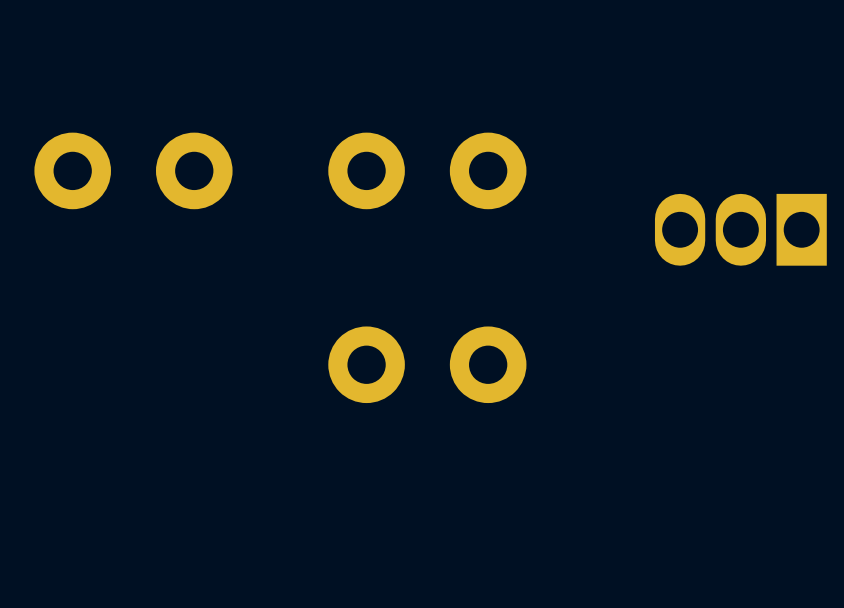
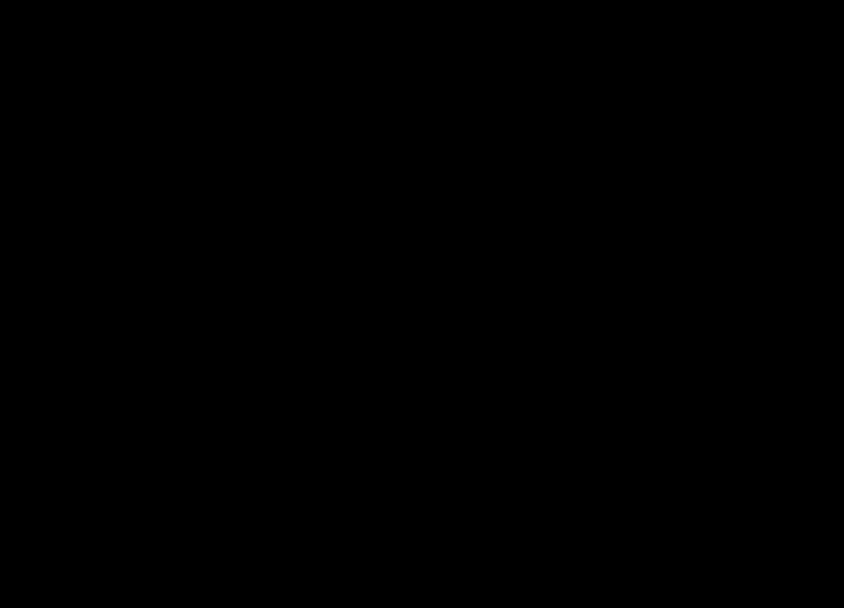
part: (133, 170) -> none
part: (427, 170) -> none
part: (740, 229) -> none
part: (427, 364) -> none

